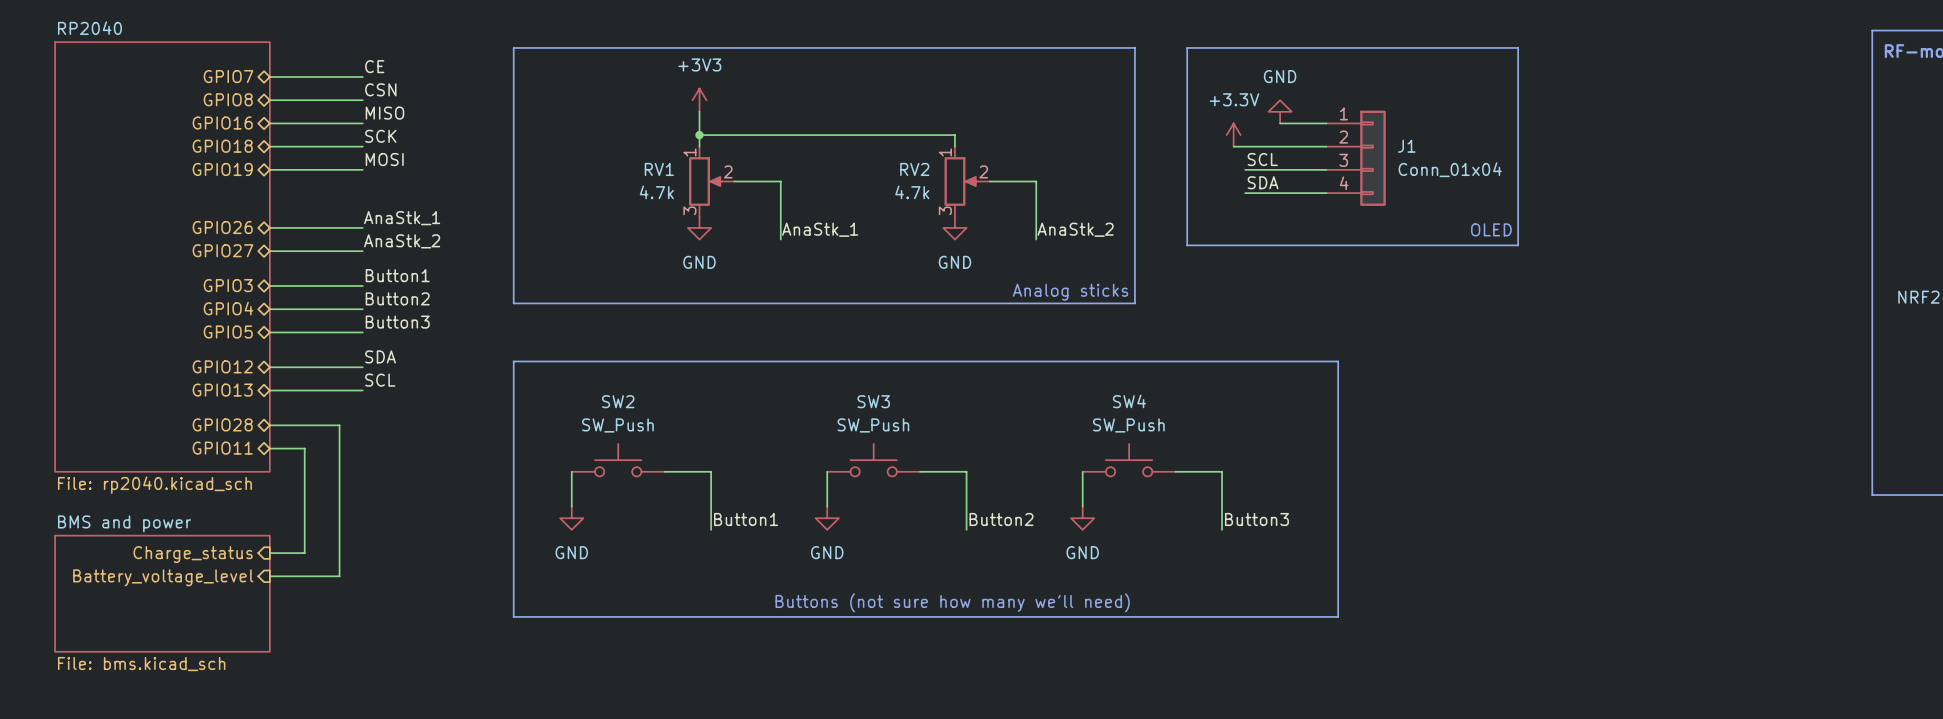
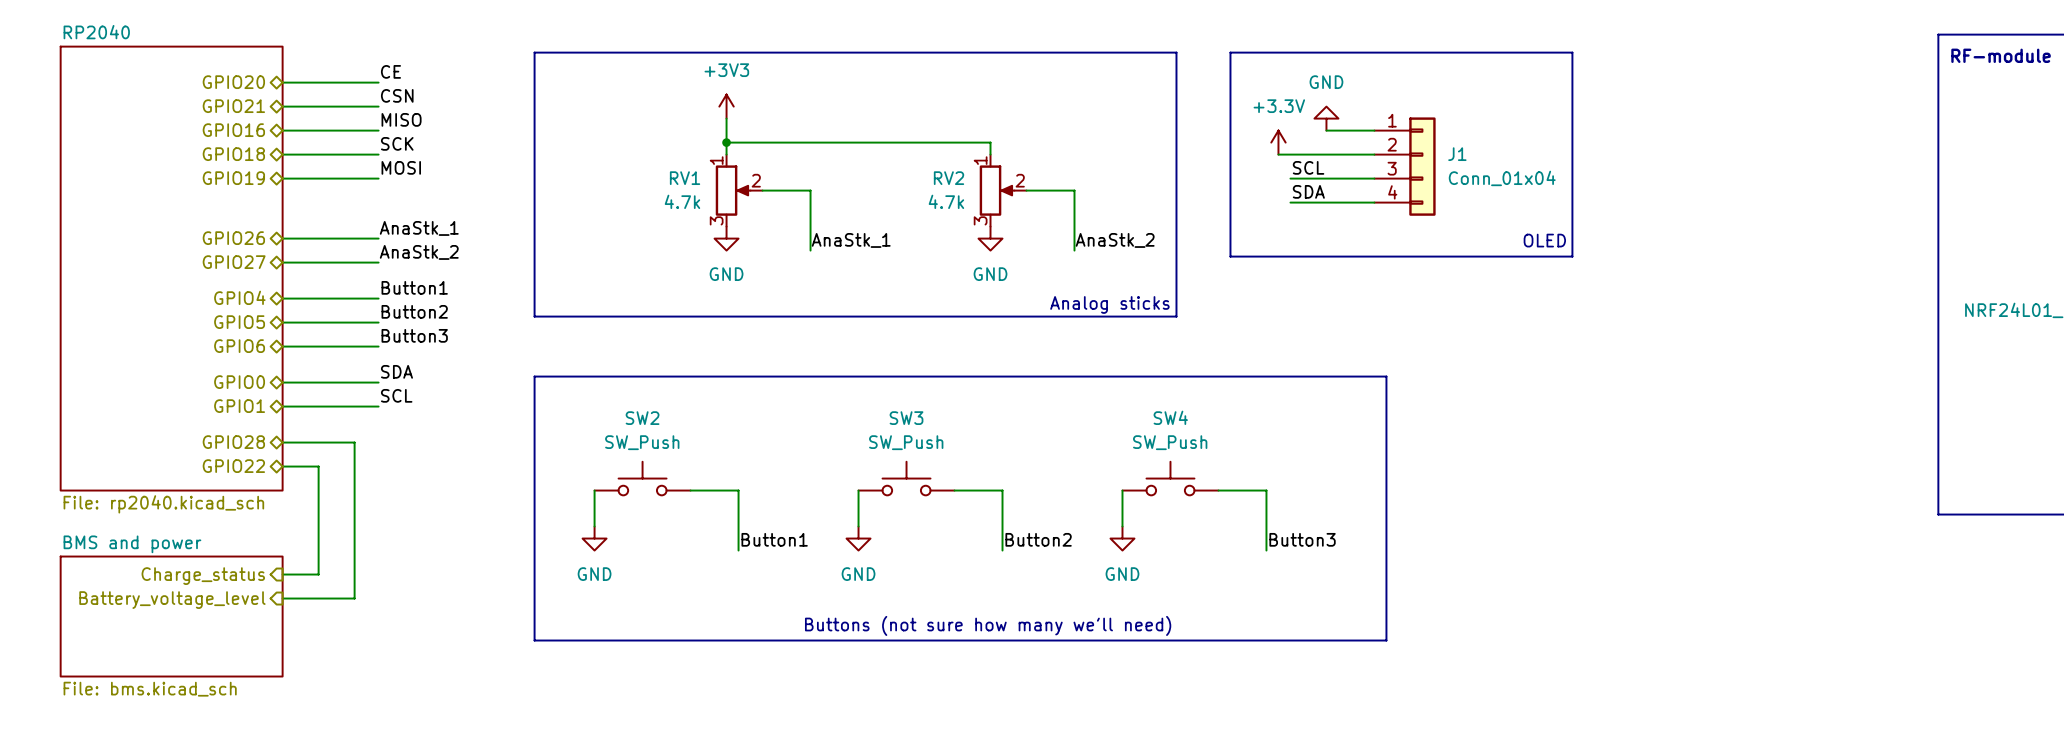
hierarchical label: GPIO7 (228, 76) -> GPIO20 (233, 82)
hierarchical label: GPIO8 (228, 99) -> GPIO21 (233, 106)
hierarchical label: GPIO3 (228, 285) -> GPIO4 (239, 297)
hierarchical label: GPIO4 (228, 308) -> GPIO5 (239, 322)
hierarchical label: GPIO5 (228, 332) -> GPIO6 (239, 346)
hierarchical label: GPIO12 (222, 366) -> GPIO0 (239, 382)
hierarchical label: GPIO13 (222, 390) -> GPIO1 (239, 406)
hierarchical label: GPIO11 (222, 448) -> GPIO22 (233, 466)

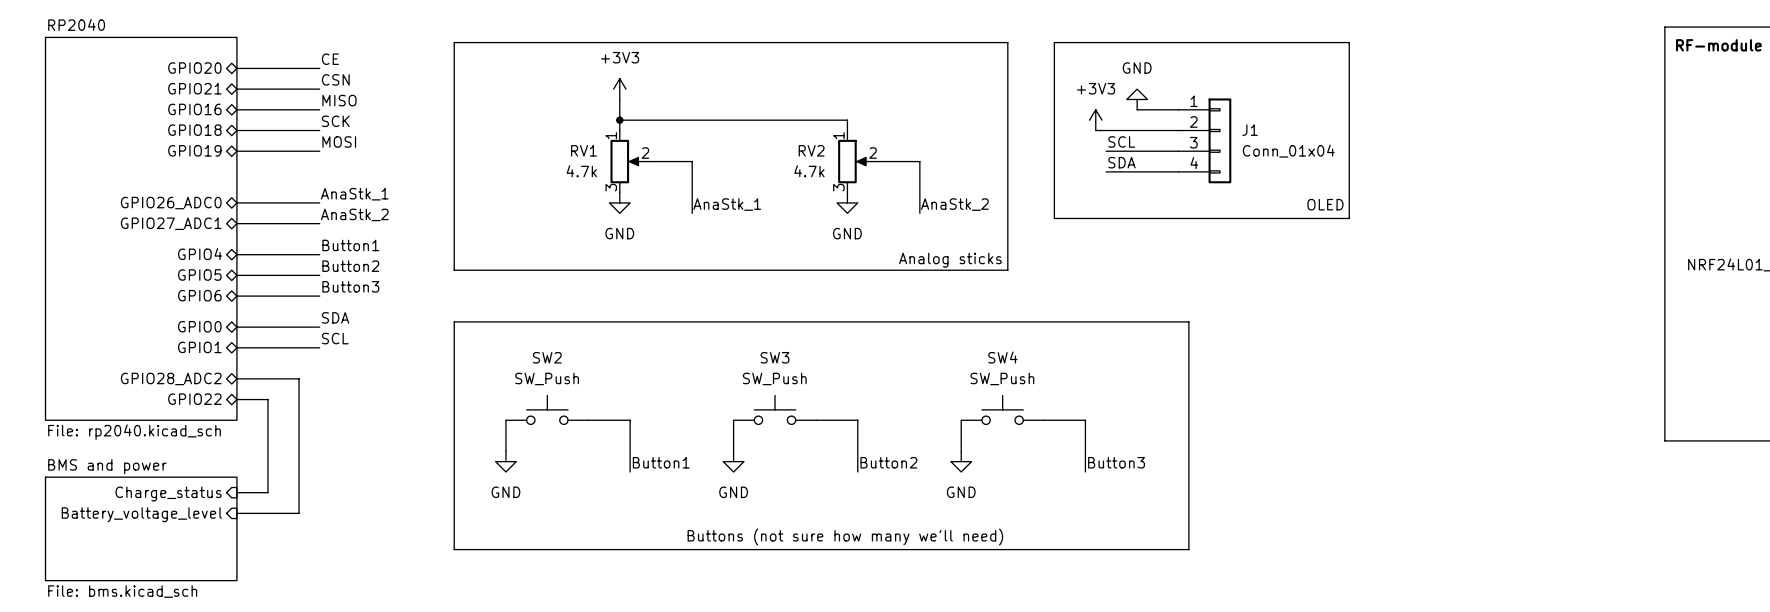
power symbol: +3.3V (1278, 142) -> +3V3 (1095, 120)
hierarchical label: GPIO26 (233, 238) -> GPIO26_ADC0 (171, 203)
hierarchical label: GPIO27 (234, 262) -> GPIO27_ADC1 (171, 223)
hierarchical label: GPIO28 (233, 442) -> GPIO28_ADC2 (171, 378)

